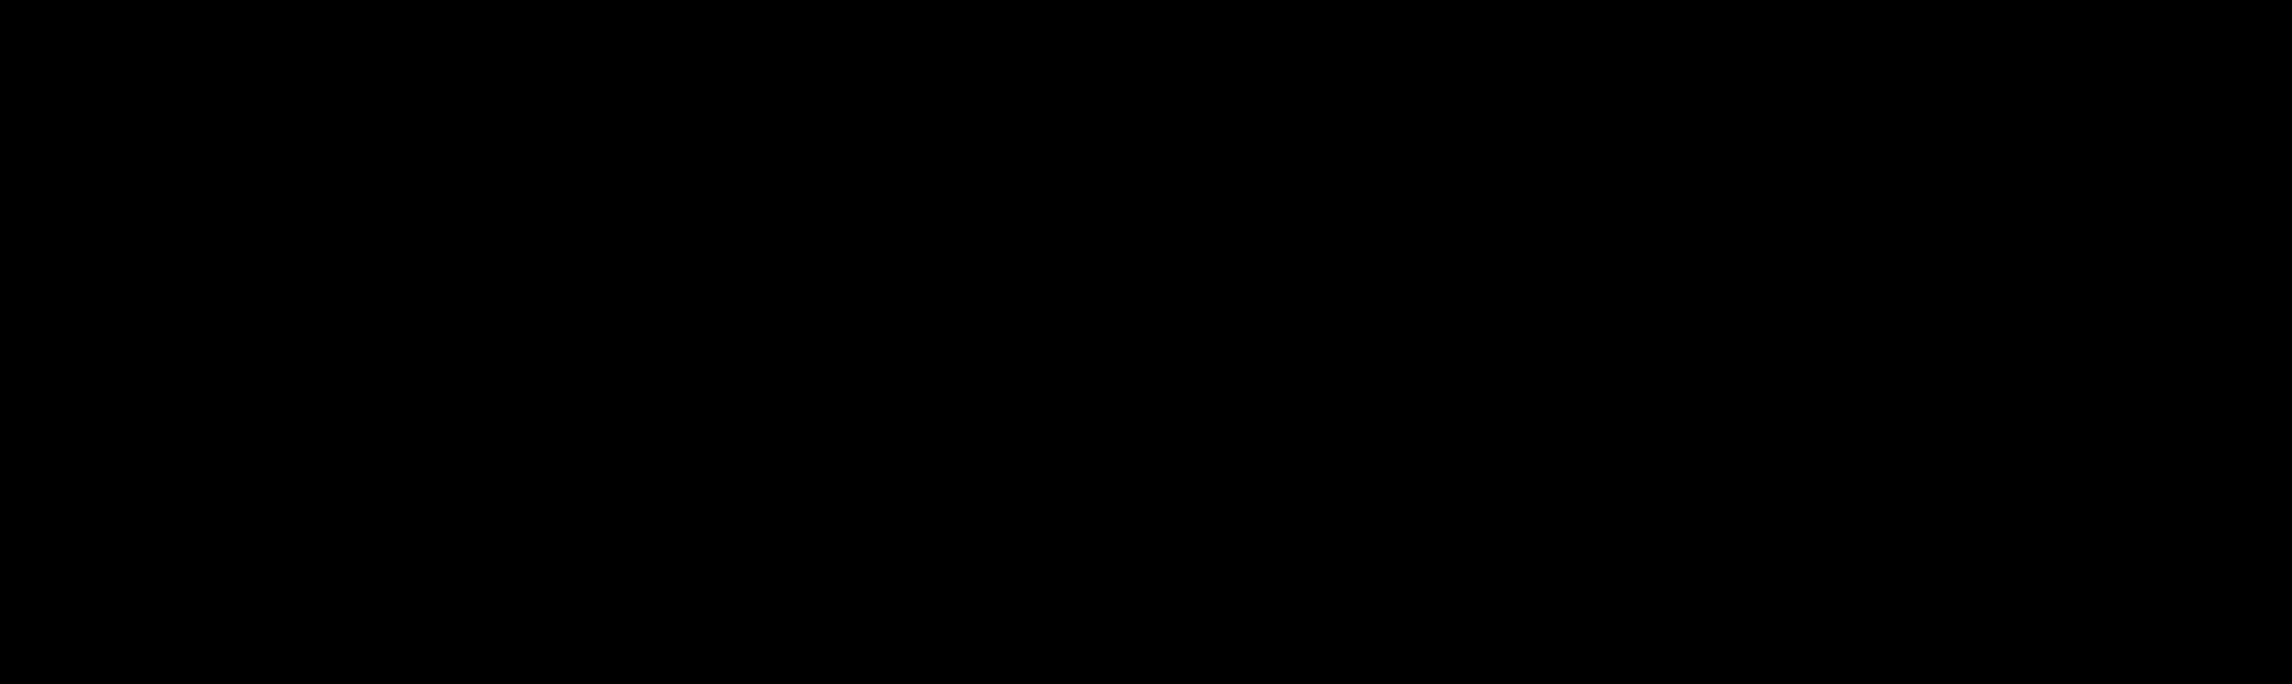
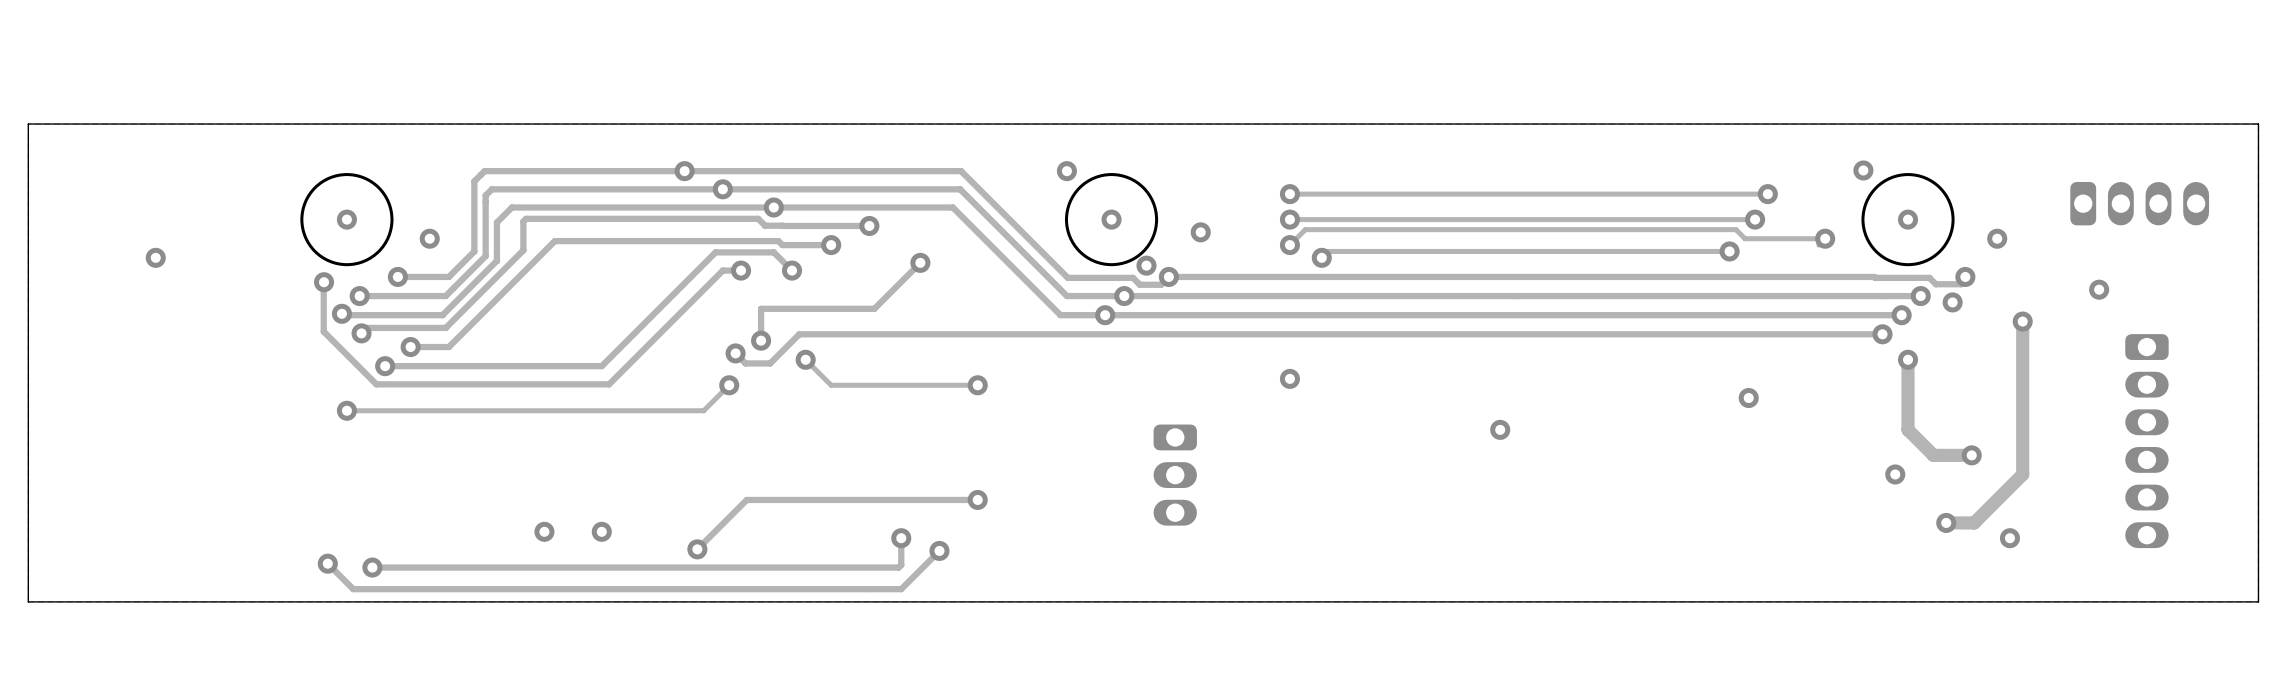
board edge: none -> (2258, 124) (28, 124) (28, 601) (2258, 601) (2258, 124)
via: none -> (1863, 170)
via: none -> (684, 171)
via: none -> (1066, 171)
drawing: none -> [300, 173, 394, 267]
drawing: none -> [1064, 173, 1159, 267]
drawing: none -> [1861, 173, 1955, 267]
via: none -> (722, 189)
via: none -> (1289, 194)
track: none -> (1767, 194) (1289, 194)
via: none -> (1767, 194)
part: none -> (2139, 203)
via: none -> (773, 207)
via: none -> (346, 219)
via: none -> (1111, 219)
via: none -> (1289, 219)
track: none -> (1755, 219) (1289, 219)
via: none -> (1755, 219)
via: none -> (1908, 219)
track: none -> (782, 225) (765, 225) (758, 218) (526, 218) (523, 221) (523, 250) (445, 327) (367, 327) (361, 333)
track: none -> (869, 225) (782, 225)
via: none -> (869, 225)
via: none -> (1200, 232)
via: none -> (429, 238)
via: none -> (1825, 238)
via: none -> (1997, 238)
track: none -> (831, 245) (782, 245) (778, 241) (554, 241) (448, 347) (410, 347)
via: none -> (831, 245)
via: none -> (1289, 245)
track: none -> (1818, 245) (1825, 238) (1745, 238) (1735, 229) (1305, 229) (1289, 245)
track: none -> (1729, 251) (1328, 251) (1321, 257)
via: none -> (1729, 251)
via: none -> (155, 257)
via: none -> (1321, 257)
track: none -> (920, 262) (874, 308) (761, 308) (761, 340)
via: none -> (920, 262)
via: none -> (1146, 265)
track: none -> (741, 270) (722, 270) (609, 384) (376, 384) (323, 331) (323, 282)
via: none -> (741, 270)
track: none -> (792, 270) (773, 252) (715, 252) (601, 366) (385, 366)
via: none -> (792, 270)
via: none -> (397, 276)
via: none -> (1168, 276)
track: none -> (1965, 276) (1965, 280) (1961, 284) (1935, 284) (1929, 277) (1874, 276) (1168, 276) (1161, 284) (1139, 284) (1133, 277) (1067, 277) (961, 171) (484, 171) (474, 181) (474, 251) (448, 276) (397, 276)
via: none -> (1965, 276)
via: none -> (324, 282)
via: none -> (2099, 289)
via: none -> (359, 296)
via: none -> (1124, 296)
track: none -> (1920, 296) (1066, 296) (960, 189) (491, 189) (485, 195) (485, 256) (445, 296) (359, 296)
via: none -> (1920, 296)
via: none -> (1952, 302)
track: none -> (341, 313) (442, 315) (496, 260) (496, 222) (511, 207) (952, 207) (1060, 315) (1901, 315)
via: none -> (341, 313)
via: none -> (1105, 315)
via: none -> (1901, 315)
track: none -> (2022, 321) (2022, 474) (1974, 522) (1946, 522)
via: none -> (2022, 321)
via: none -> (361, 333)
track: none -> (1882, 334) (799, 334) (770, 363) (745, 363) (735, 353)
via: none -> (1882, 334)
via: none -> (761, 340)
via: none -> (410, 347)
via: none -> (735, 353)
track: none -> (805, 359) (831, 385) (977, 385)
via: none -> (805, 359)
track: none -> (1908, 359) (1908, 429) (1933, 455) (1971, 455)
via: none -> (1908, 359)
via: none -> (385, 366)
via: none -> (1289, 378)
track: none -> (729, 385) (703, 410) (346, 410)
via: none -> (729, 385)
via: none -> (977, 385)
via: none -> (1748, 398)
via: none -> (346, 410)
via: none -> (1500, 429)
part: none -> (2146, 441)
via: none -> (1971, 455)
via: none -> (1895, 474)
part: none -> (1175, 475)
track: none -> (977, 499) (746, 499) (697, 549)
via: none -> (977, 499)
via: none -> (1946, 522)
via: none -> (544, 531)
via: none -> (601, 531)
track: none -> (901, 538) (901, 565) (898, 567) (372, 567)
via: none -> (901, 538)
via: none -> (2009, 538)
via: none -> (697, 549)
track: none -> (939, 550) (901, 589) (353, 589) (327, 563)
via: none -> (939, 550)
via: none -> (327, 563)
via: none -> (372, 567)

